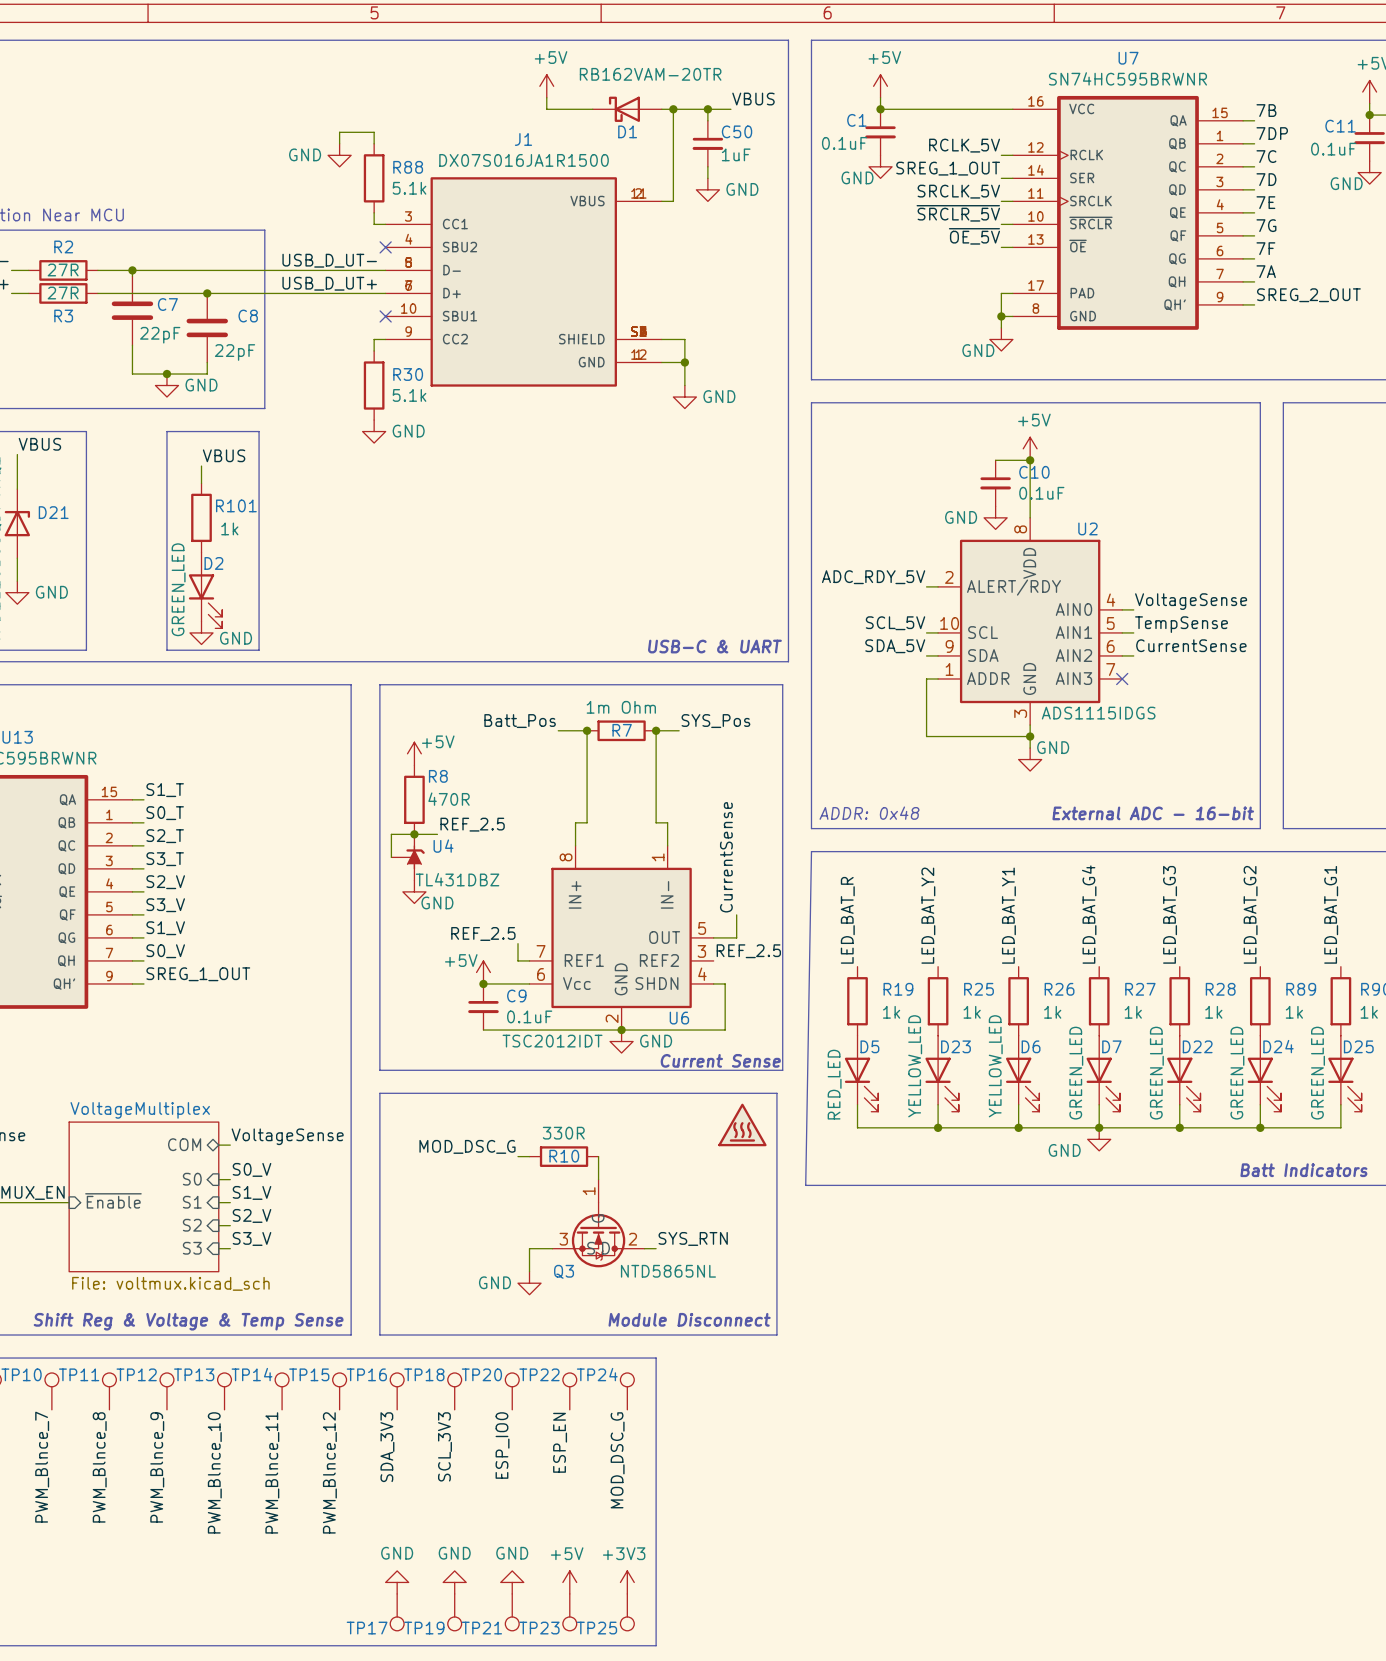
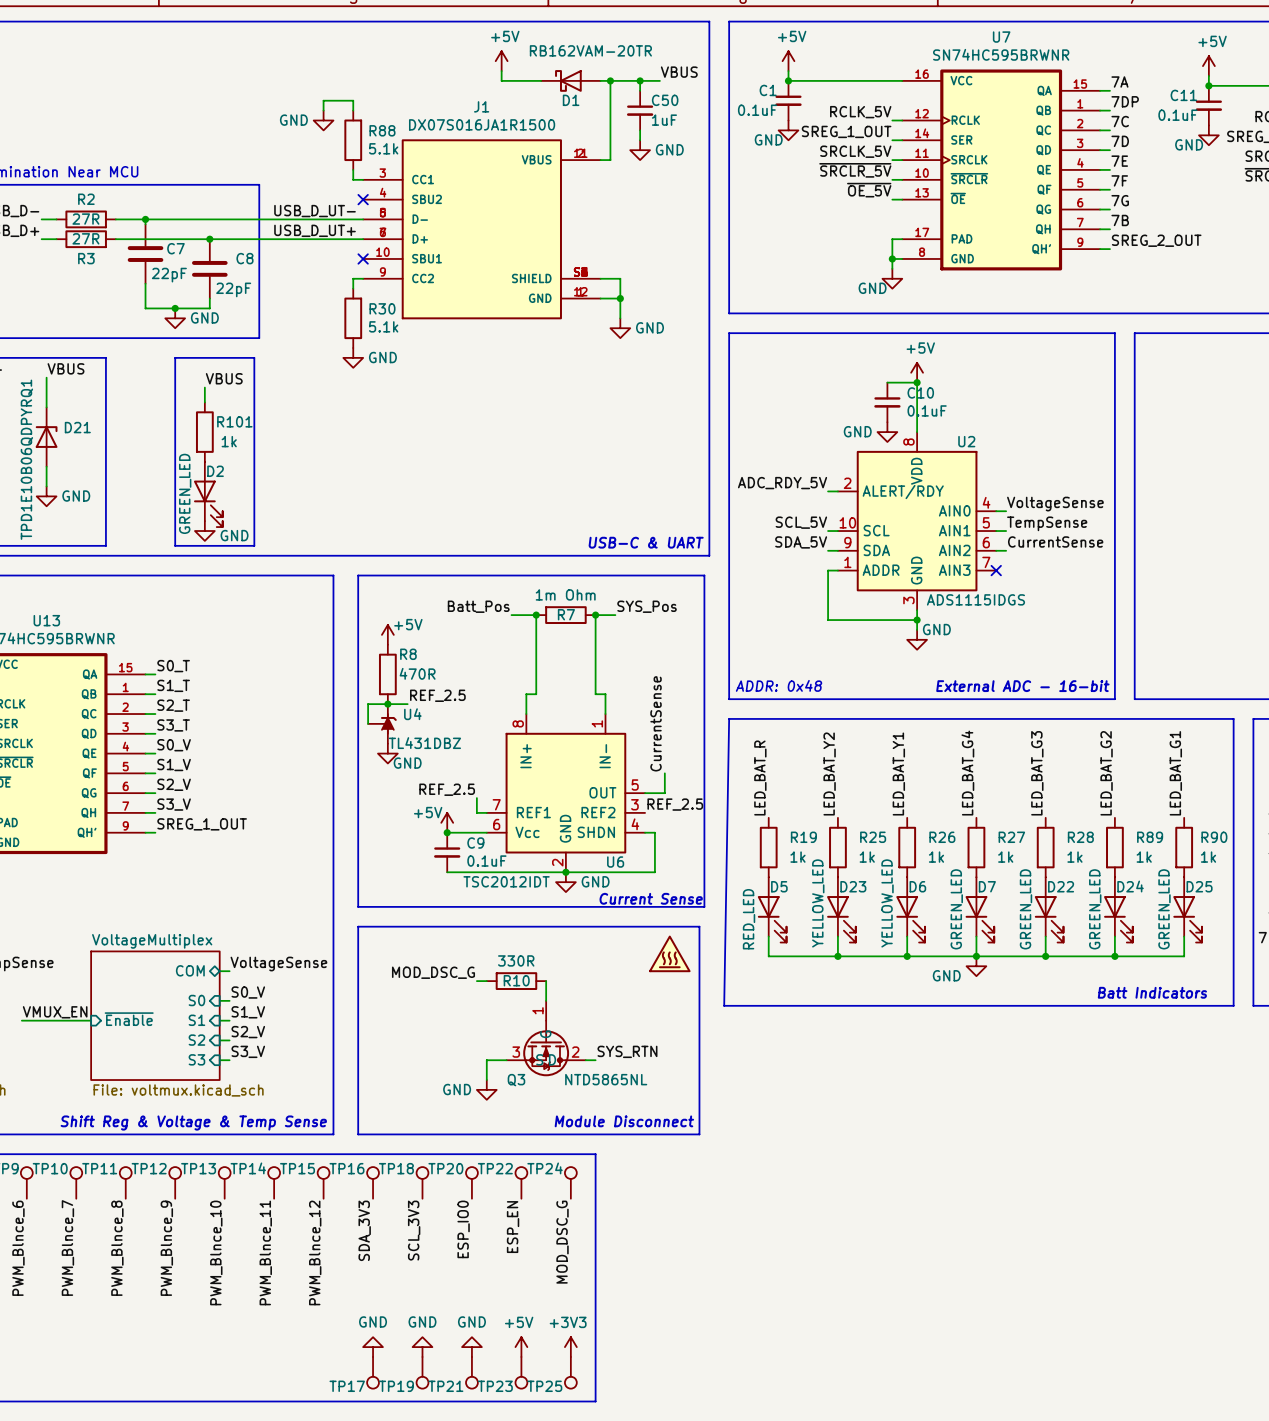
label: 7B (1266, 110) -> 7A (1119, 81)
label: 7G (1266, 225) -> 7F (1119, 180)
label: 7F (1265, 248) -> 7G (1120, 200)
label: 7A (1266, 271) -> 7B (1120, 220)
label: S1_T (165, 790) -> S0_T (173, 666)
label: S0_T (165, 813) -> S1_T (173, 685)
label: S2_V (165, 882) -> S0_V (174, 745)
label: S3_V (165, 905) -> S1_V (174, 765)
label: S1_V (165, 928) -> S2_V (174, 784)
label: S0_V (165, 951) -> S3_V (174, 804)

